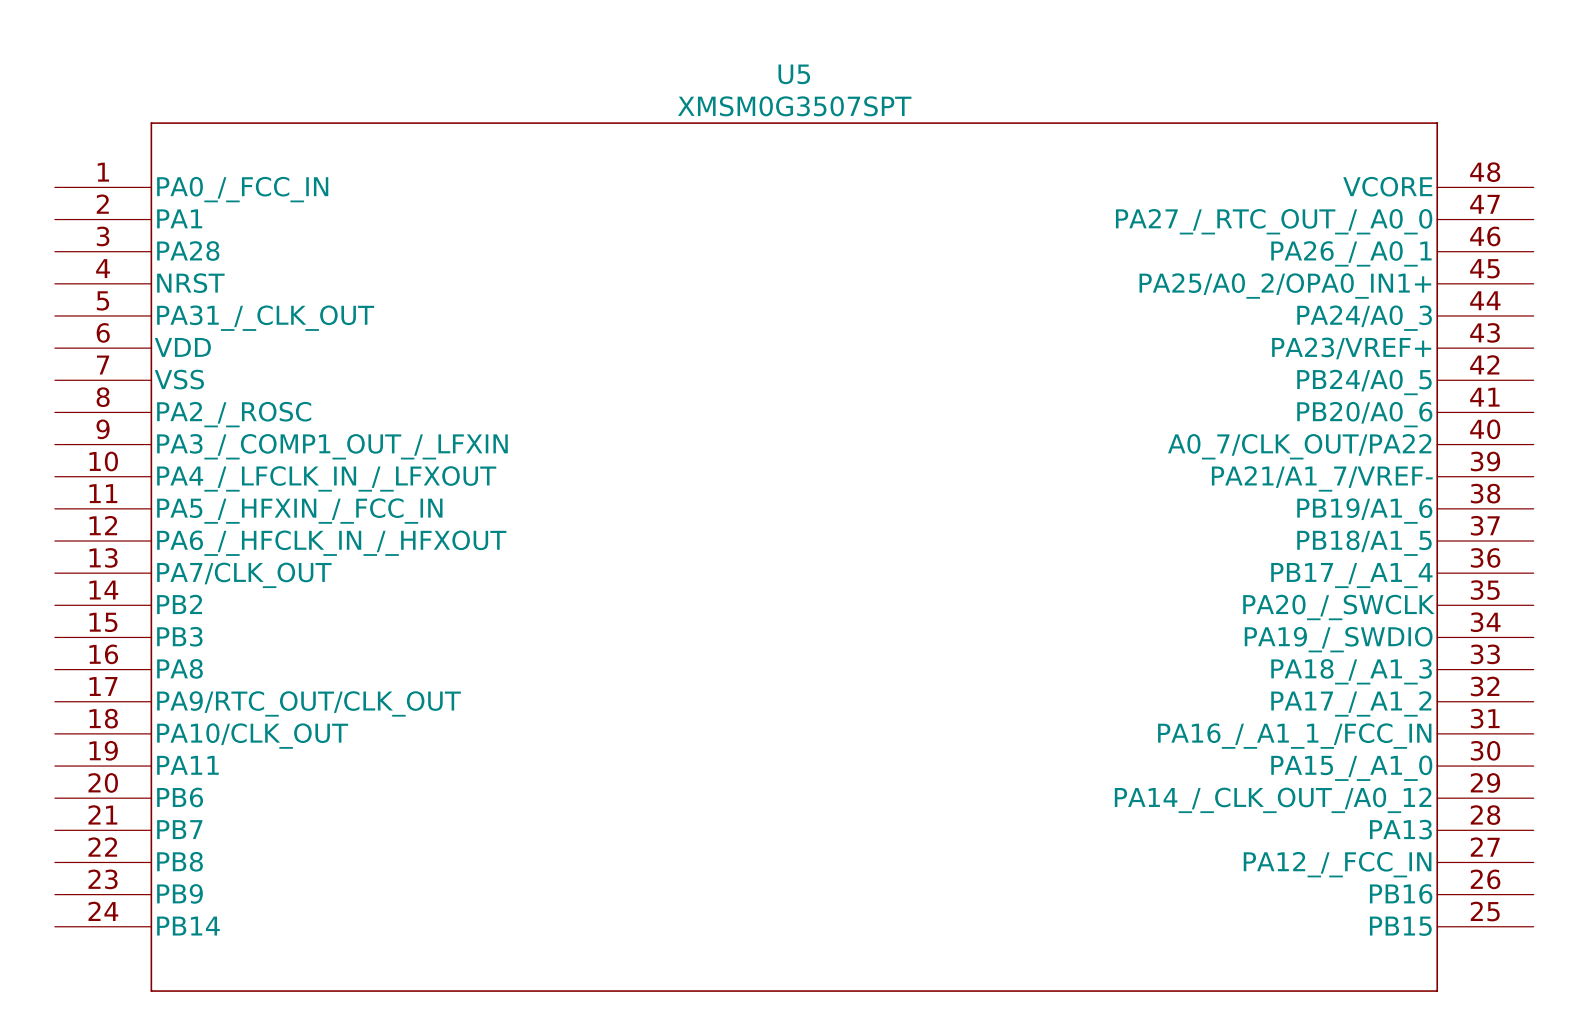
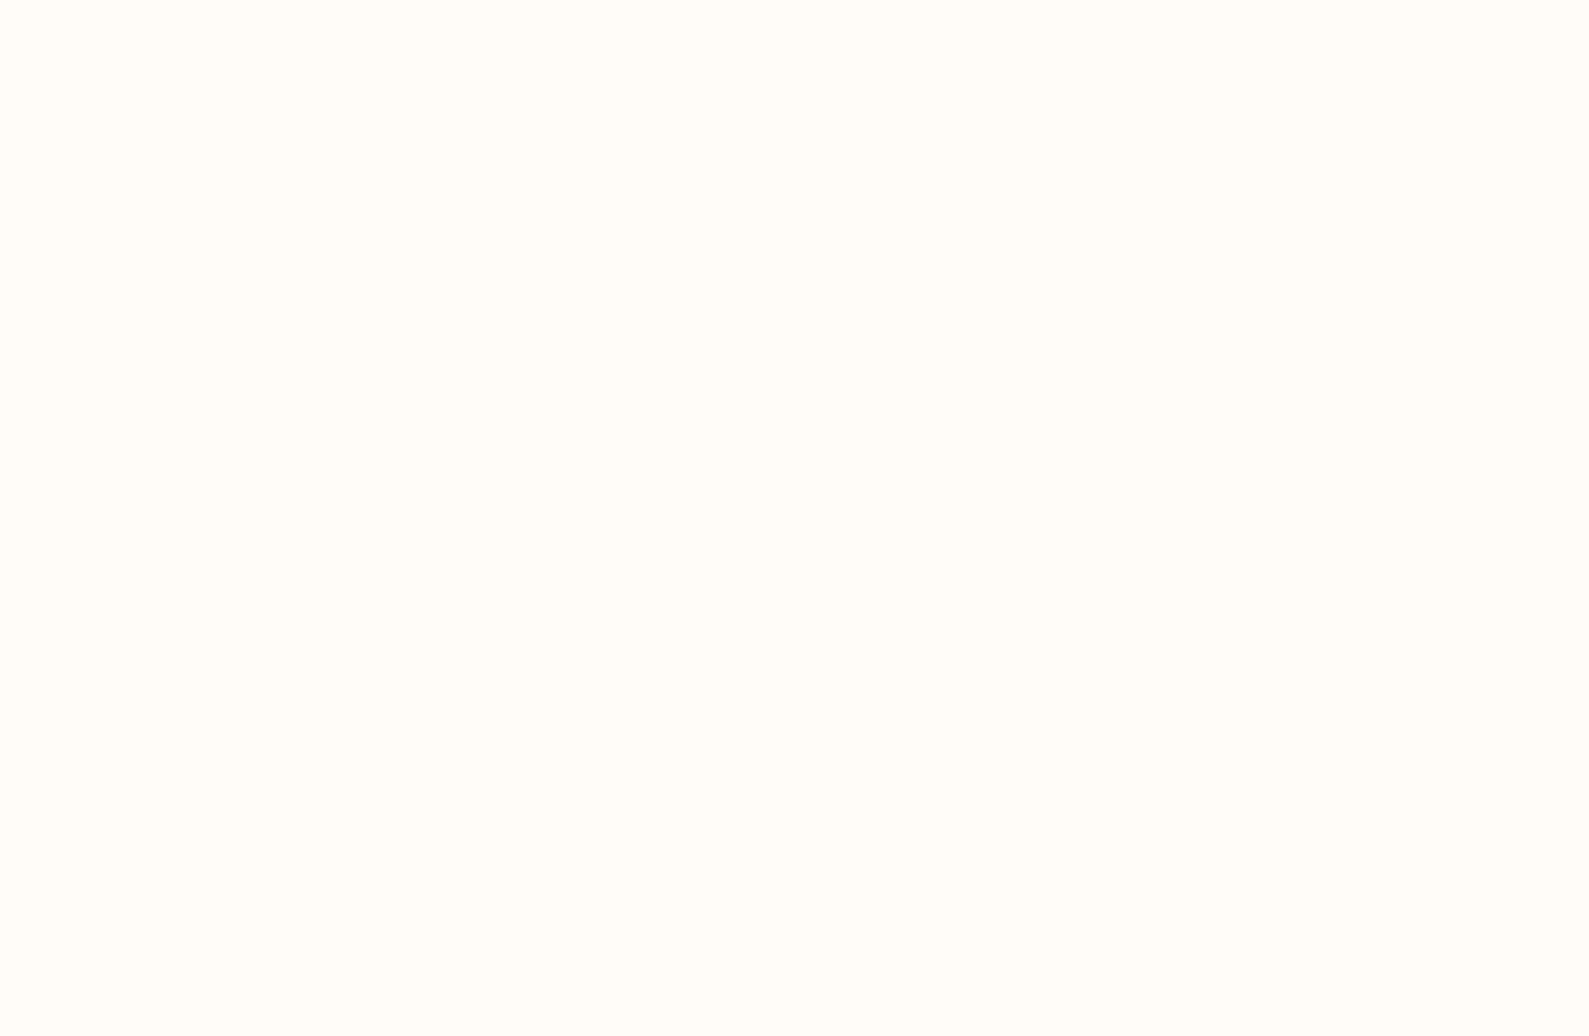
U5: XMSM0G3507SPT (794, 557) -> none

